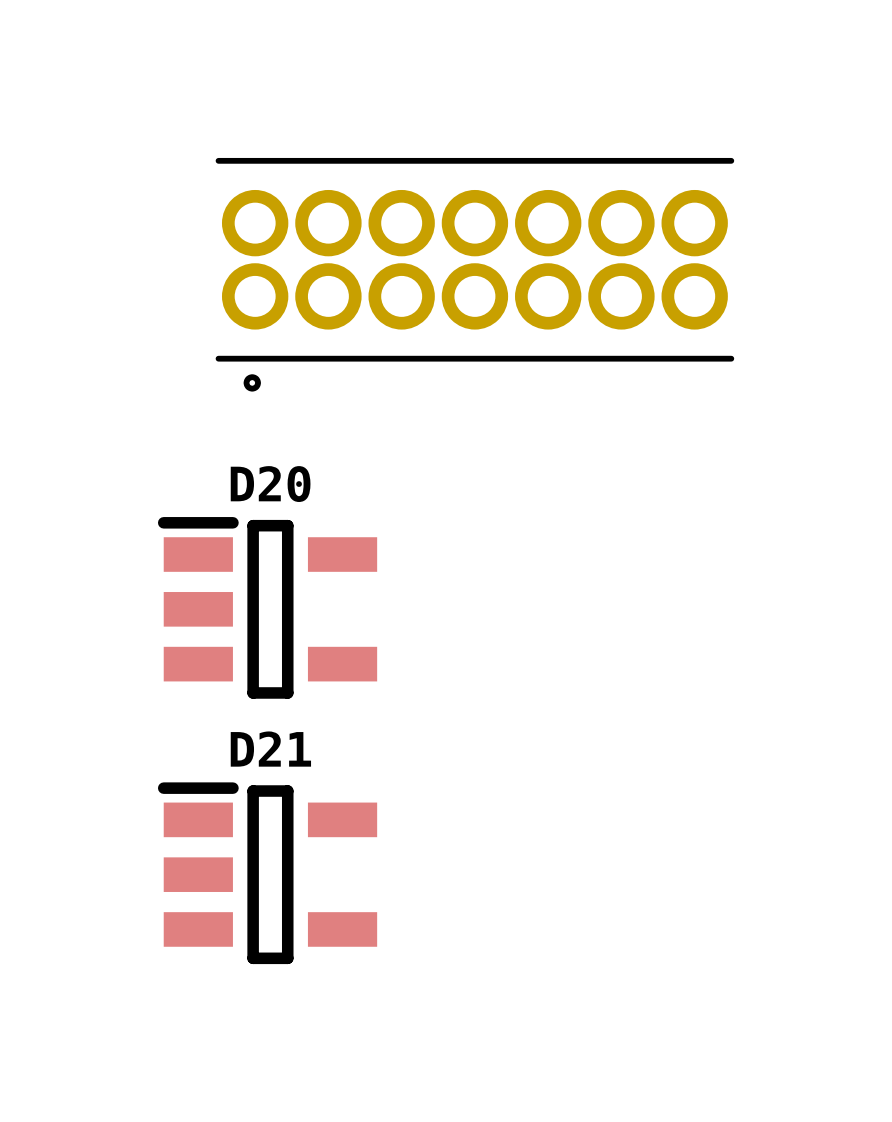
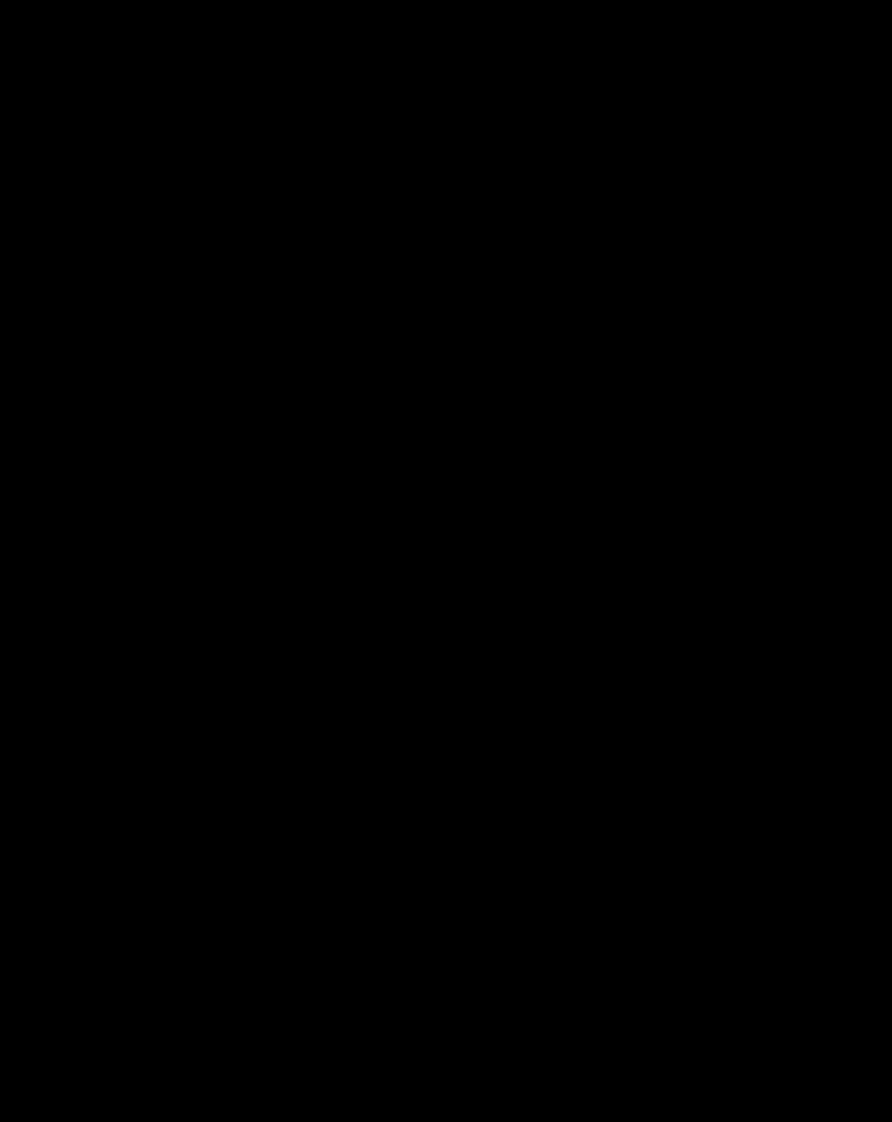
part: (474, 274) -> none
D20: (267, 607) -> none
D21: (267, 873) -> none

